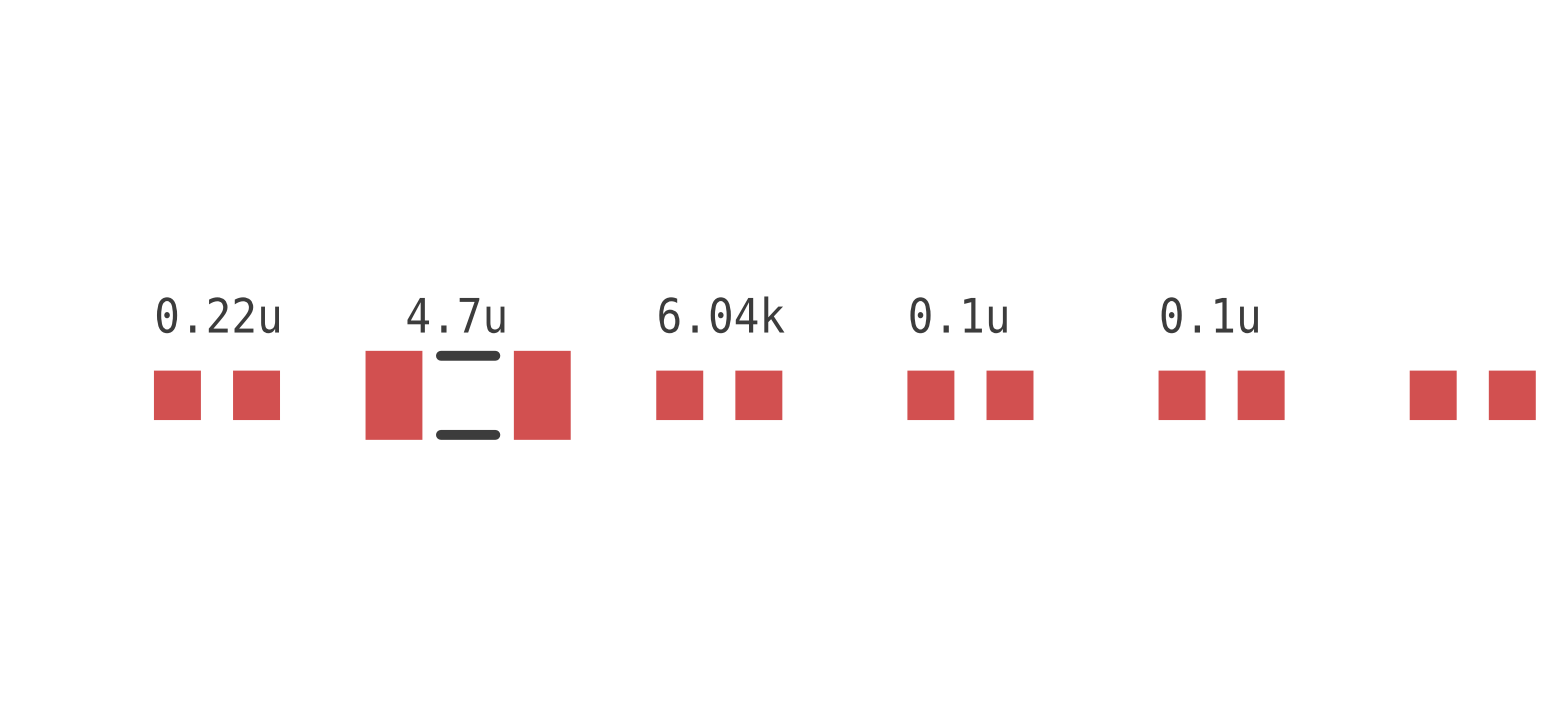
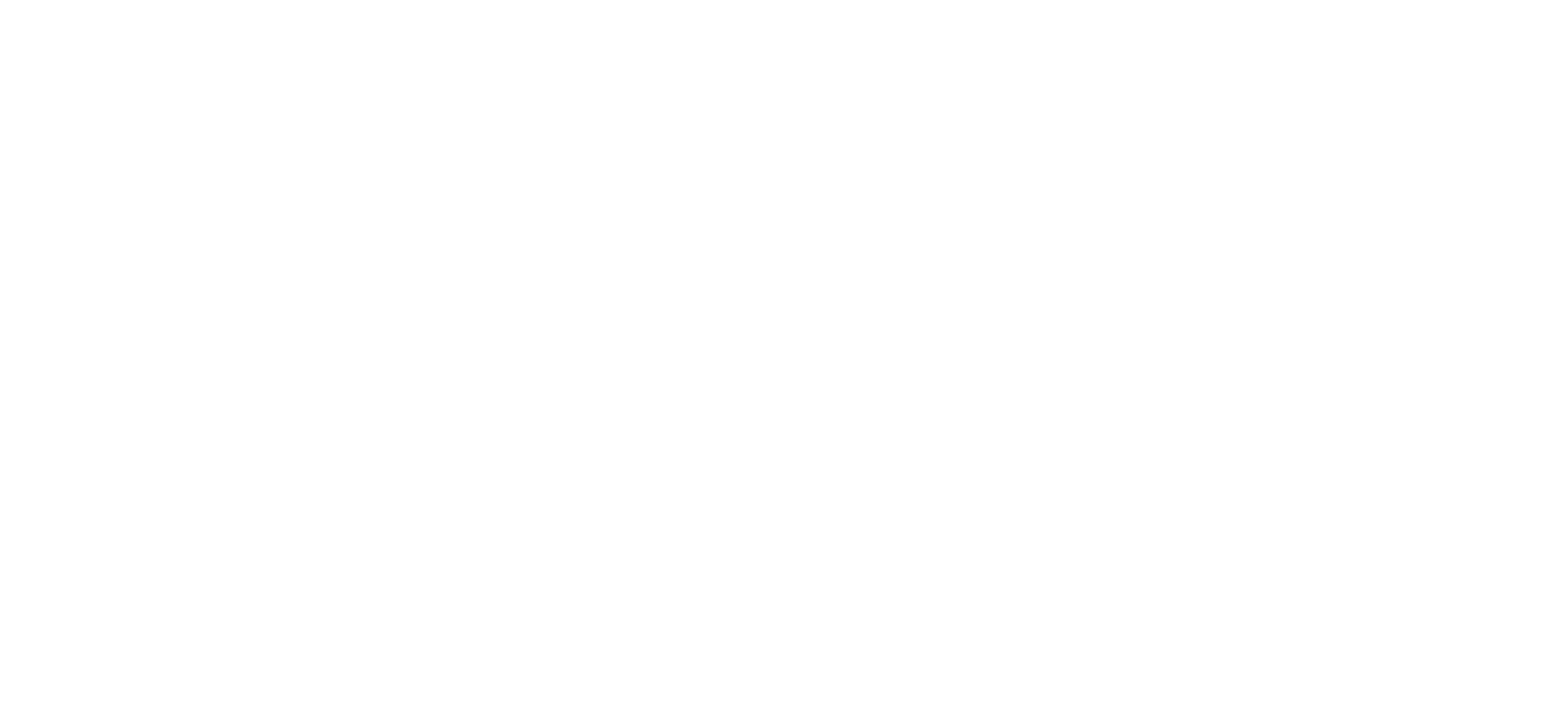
part: 0.22u (216, 395) -> none
part: 4.7u (468, 395) -> none
part: 6.04k (719, 395) -> none
part: 0.1u (970, 395) -> none
part: 0.1u (1221, 395) -> none
part: (1472, 395) -> none

